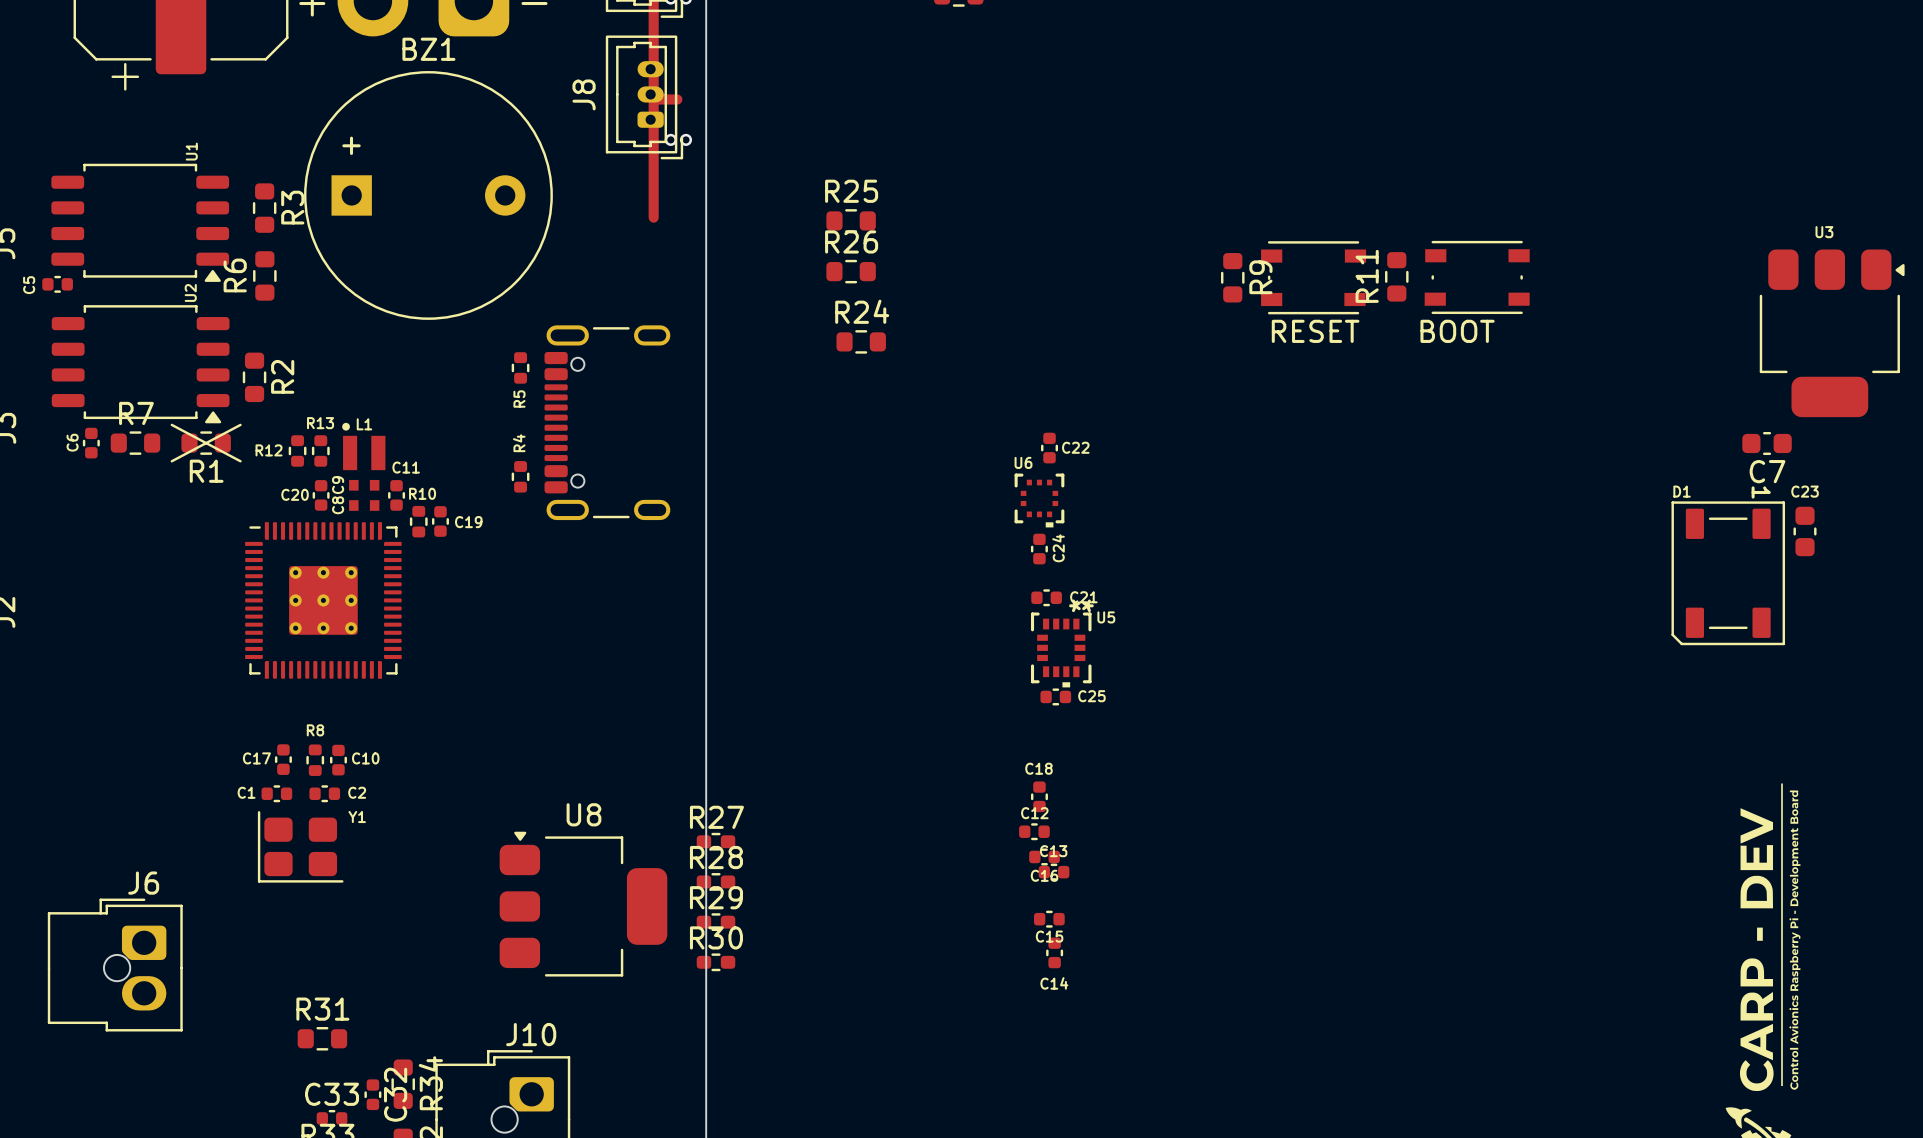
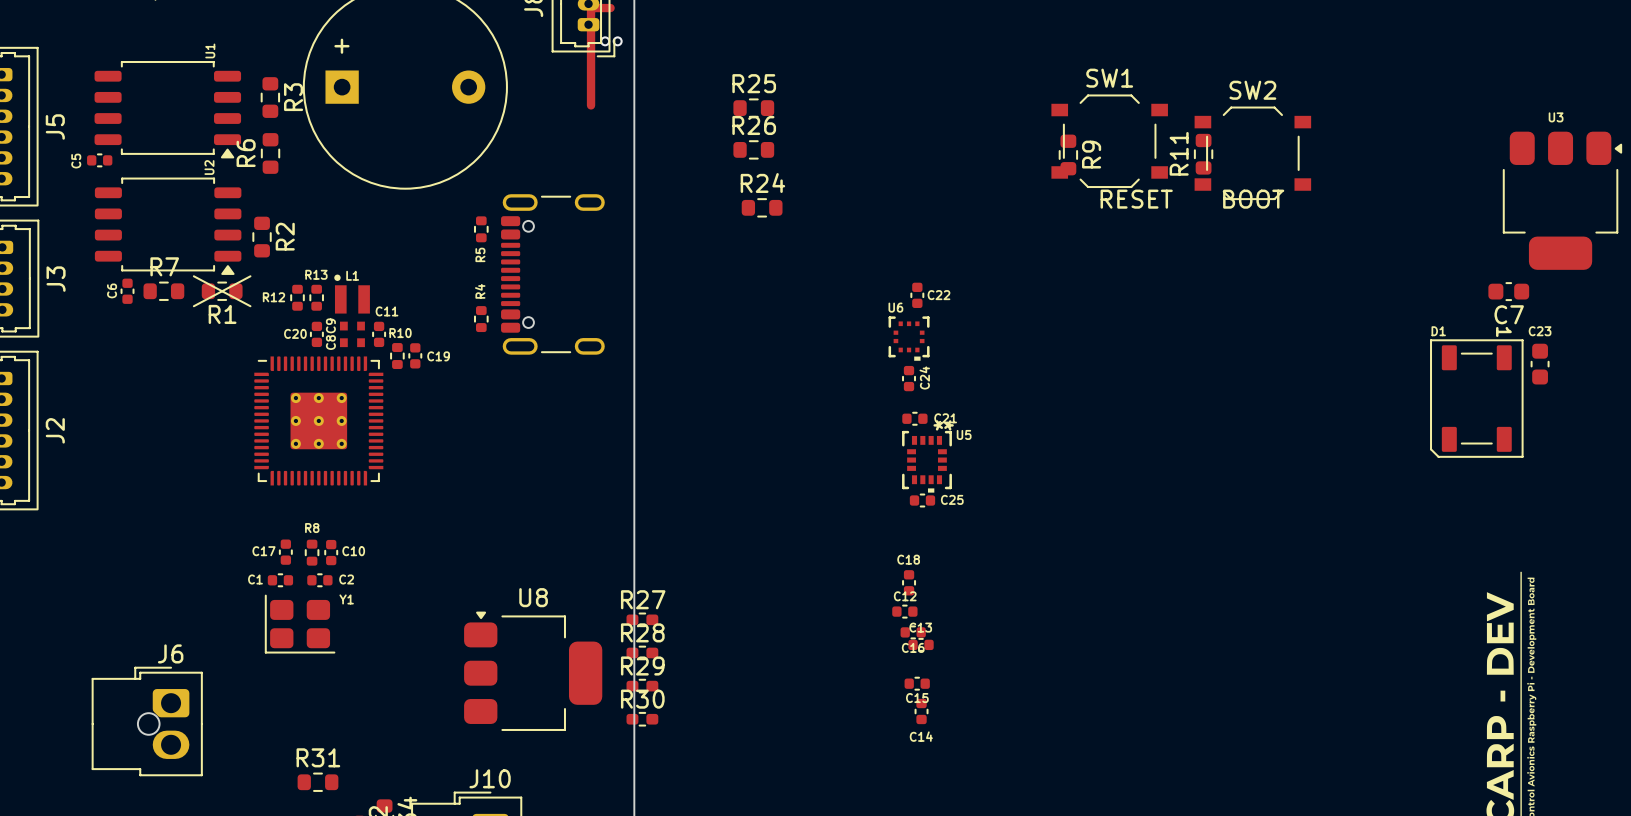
SW1: none -> (1109, 141)
SW2: none -> (1252, 153)
part: (1313, 277) -> none
part: (1477, 277) -> none

